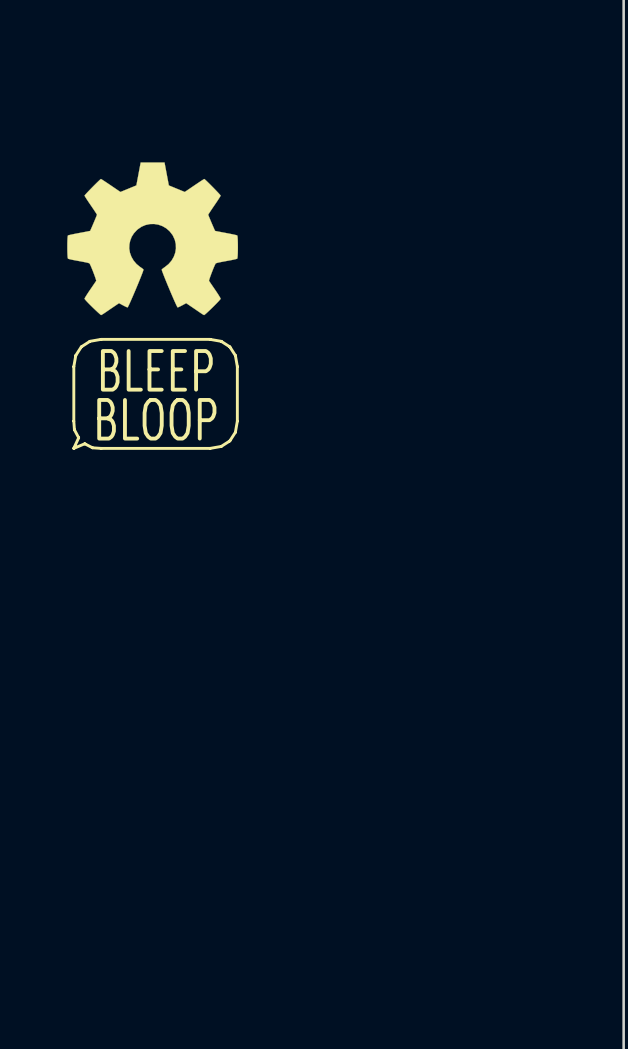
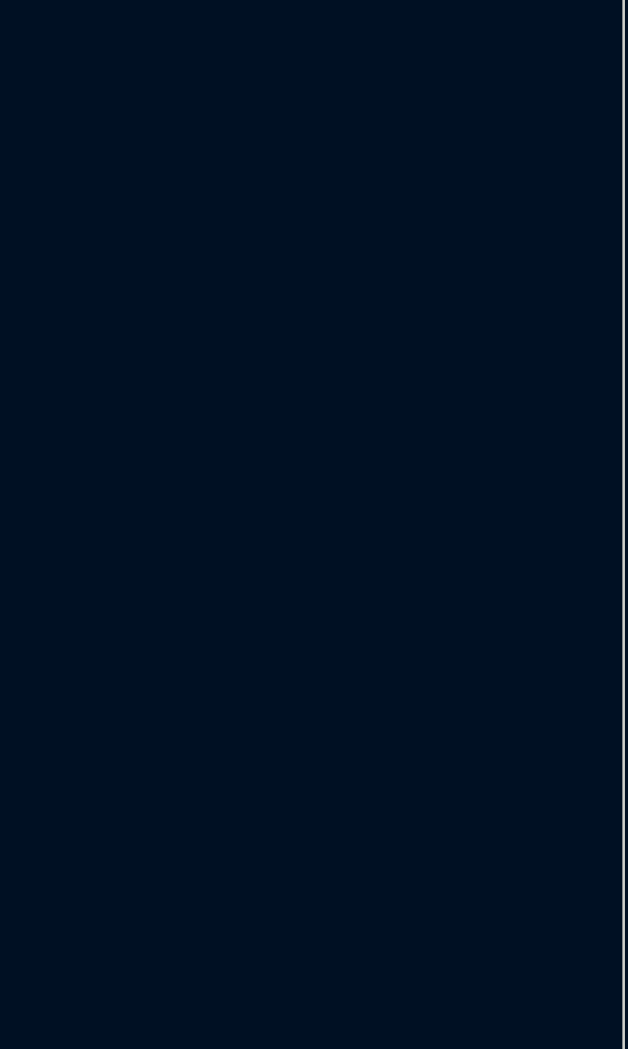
drawing: [67, 162, 239, 450] -> none

